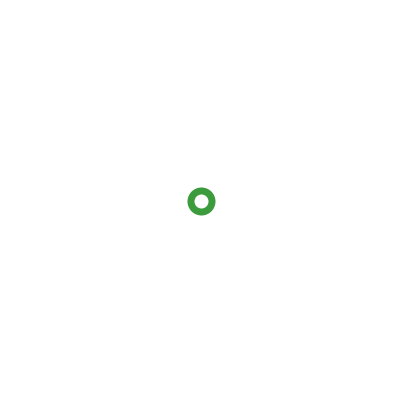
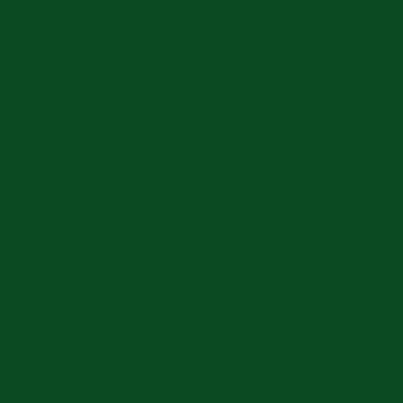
via: (201, 201) -> none

